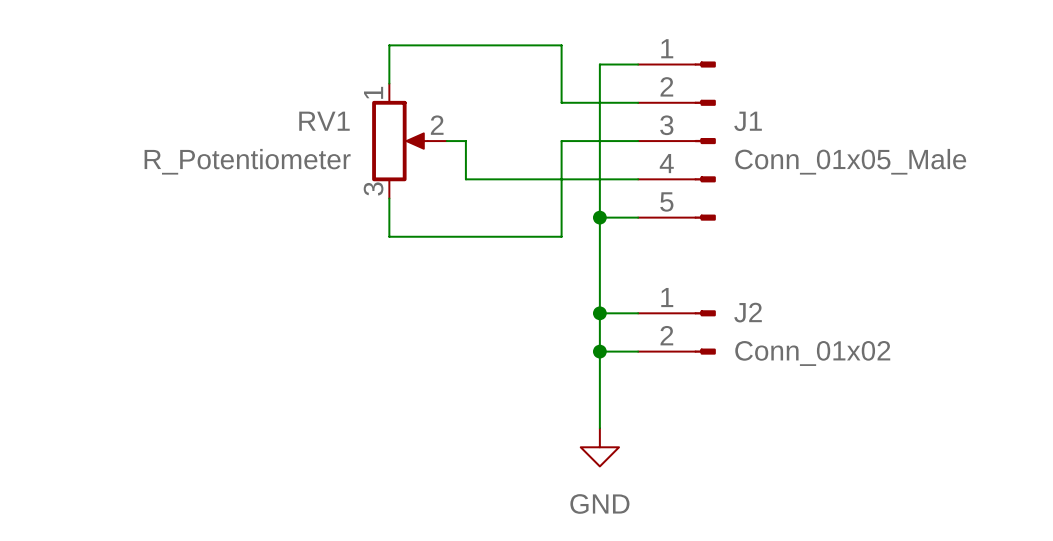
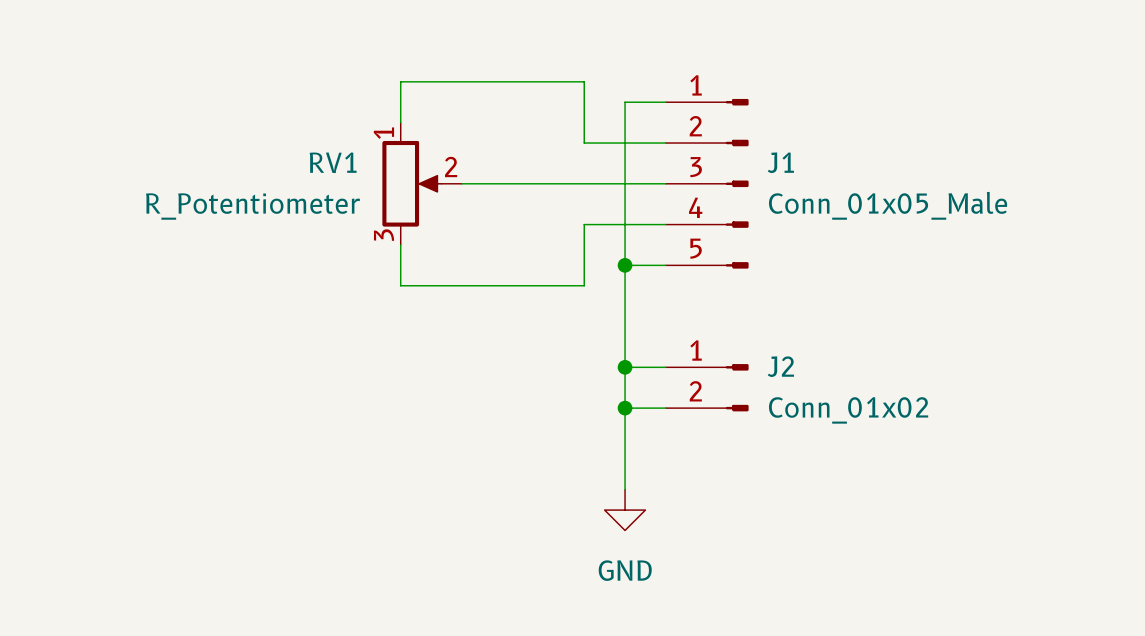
wire: (465, 141) (465, 179) (561, 179) (561, 141) -> (482, 183) (584, 183)

